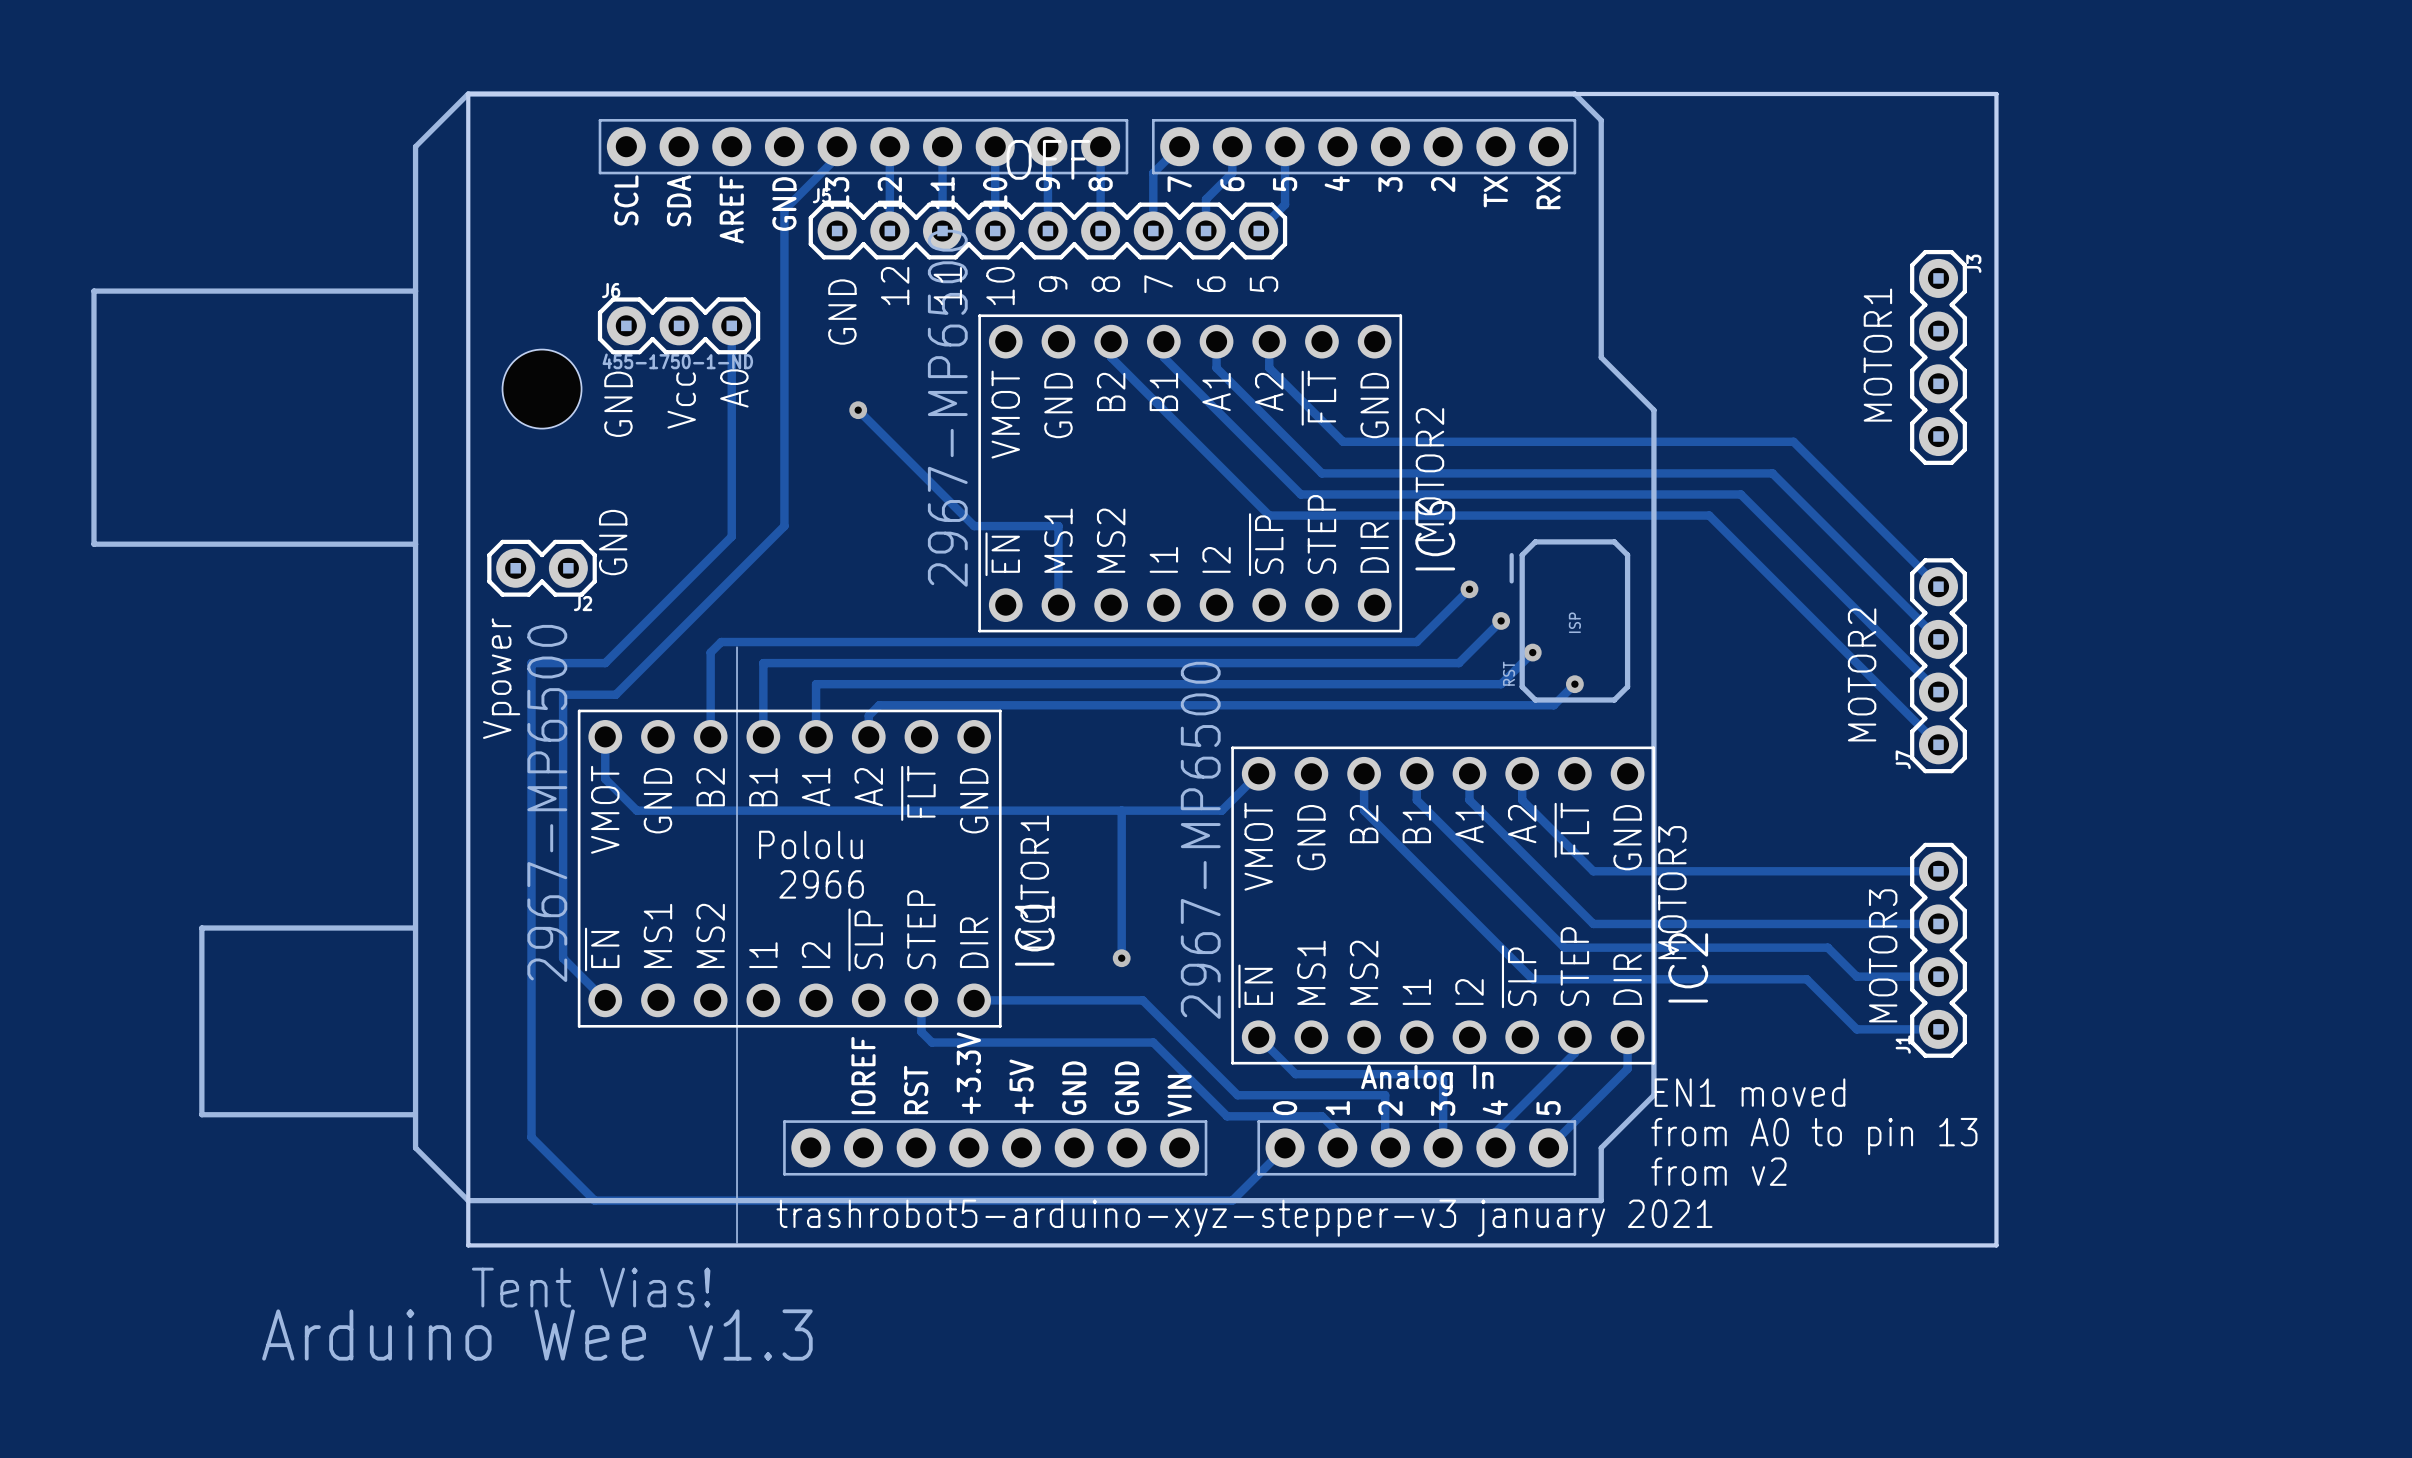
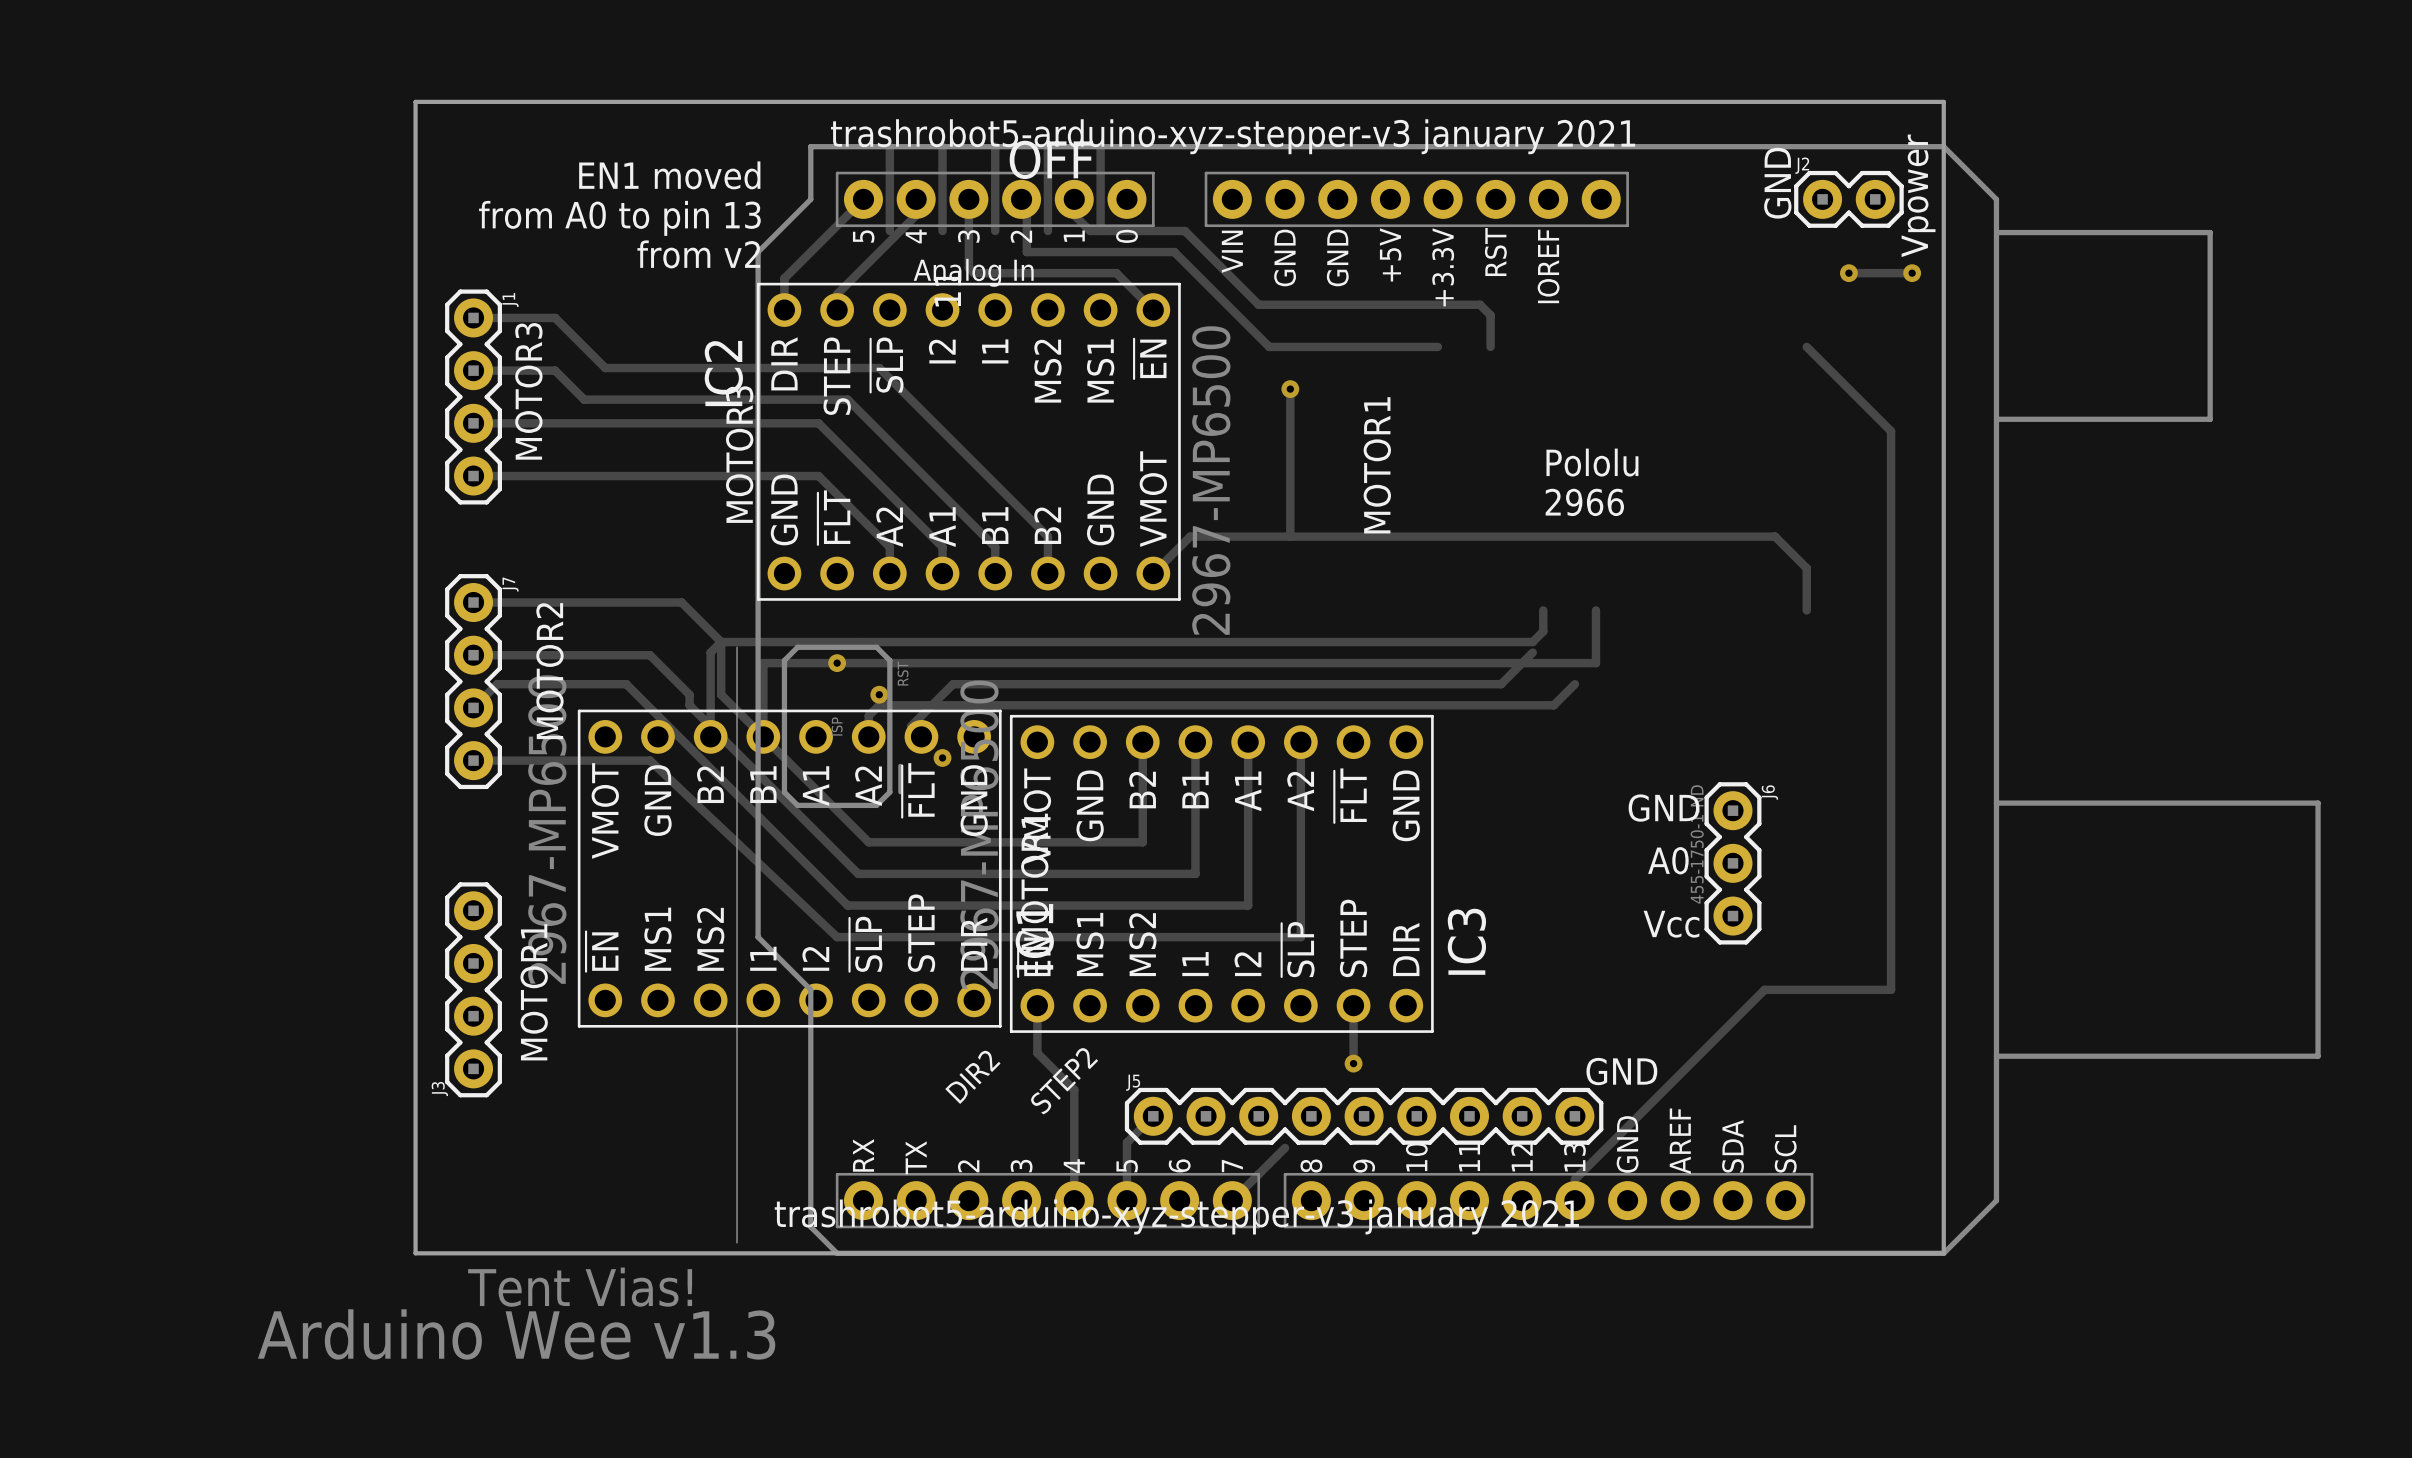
board edge: (468, 93) (1996, 93) (1996, 1245) (468, 1245) (468, 93) -> (415, 101) (1943, 101) (1943, 1253) (415, 1253) (415, 101)
text: none -> trashrobot5-arduino-xyz-stepper-v3 january 2021 (1233, 136)
track: (837, 146) (837, 157) (784, 209) (784, 278) -> (863, 199) (784, 278)
track: (1179, 146) (1153, 173) (1153, 231) -> none
track: (1232, 146) (1232, 173) (1206, 199) (1206, 231) -> none
track: (1285, 146) (1285, 204) (1258, 231) -> none
text: none -> EN1 moved (669, 175)
text: none -> GND (1777, 183)
text: none -> Vpower (1918, 195)
track: none -> (916, 199) (916, 215) (837, 294) (837, 310)
track: none -> (968, 199) (968, 267) (974, 273) (1116, 273) (1153, 310)
track: none -> (1021, 199) (1026, 204) (1026, 252) (1174, 252) (1269, 346) (1437, 346)
track: none -> (1074, 199) (1074, 215) (1090, 231) (1184, 231) (1258, 304) (1480, 304) (1490, 315) (1490, 346)
text: none -> from A0 to pin 13 (619, 218)
J5 position: (1047, 231) -> (1364, 1116)
text: none -> from v2 (698, 254)
J3 name position: J3 (1973, 263) -> J3 (439, 1088)
track: none -> (1848, 273) (1912, 273)
via: none -> (1848, 273)
via: none -> (1912, 273)
text: 9 (1053, 284) -> none
text: 8 (1105, 284) -> none
text: 7 (1158, 284) -> none
text: 6 (1211, 284) -> none
text: 5 (1263, 284) -> none
text: 12 (895, 286) -> none
text: 10 (1000, 286) -> none
track: (784, 310) (784, 526) (615, 694) (563, 694) (563, 958) (605, 1000) -> none
text: GND (842, 312) -> none
track: none -> (473, 317) (555, 317) (605, 368) (879, 368) (1047, 536) (1047, 573)
J6 rotation: 0° (679, 325) -> 90° clockwise (1732, 863)
J6 position: (679, 325) -> (1732, 863)
track: (731, 325) (731, 536) (605, 663) (531, 663) (531, 1137) (594, 1200) (1232, 1200) -> none
track: (1111, 341) (1111, 357) (1269, 515) (1709, 515) (1938, 744) -> none
track: (1163, 341) (1163, 357) (1300, 494) (1740, 494) (1938, 692) -> none
track: (1216, 341) (1216, 368) (1321, 473) (1772, 473) (1938, 639) -> none
track: (1269, 341) (1269, 368) (1343, 441) (1793, 441) (1938, 586) -> none
track: none -> (1806, 346) (1891, 431) (1891, 989) (1764, 989) (1574, 1179) (1574, 1200)
text: MOTOR1 (1877, 355) -> none
J3 position: (1938, 357) -> (473, 989)
track: none -> (473, 370) (555, 370) (584, 399) (847, 399) (858, 410)
text: A0 (734, 388) -> none
hole: (542, 389) -> none
via: none -> (1290, 389)
text: none -> MOTOR3 (528, 391)
text: Vcc (681, 400) -> none
text: GND (618, 404) -> none
via: (858, 410) -> none
track: none -> (473, 423) (818, 423) (942, 547) (942, 573)
text: none -> MOTOR3 (739, 454)
text: none -> Pololu (1592, 462)
IC3 position: (1190, 473) -> (1221, 873)
text: MOTOR2 (1429, 474) -> MOTOR1 (1377, 465)
track: none -> (473, 476) (818, 476) (889, 547) (889, 573)
text: none -> 2966 (1584, 502)
track: (974, 526) (1058, 526) (1058, 605) -> (974, 526) (995, 547) (995, 573)
text: GND (613, 542) -> none
J2 position: (542, 568) -> (1848, 199)
track: none -> (1153, 573) (1190, 536) (1775, 536) (1806, 568) (1806, 610)
track: (1469, 589) (1416, 642) -> (1543, 610) (1543, 631) (1532, 642) (1416, 642)
via: (1469, 589) -> none
track: none -> (473, 602) (681, 602) (721, 642) (721, 694) (868, 842) (1142, 842) (1142, 742)
J2 name position: J2 (583, 603) -> J2 (1802, 165)
track: (1501, 620) (1458, 663) -> (1595, 610) (1595, 663) (1458, 663)
via: (1501, 620) -> none
part: (873, 647) -> none
via: (1532, 652) -> none
track: none -> (473, 655) (650, 655) (689, 694) (689, 705) (858, 873) (1195, 873) (1195, 742)
via: none -> (837, 663)
J7 position: (1938, 665) -> (473, 681)
text: none -> MOTOR2 (549, 671)
text: MOTOR2 (1862, 674) -> none
text: Vpower (501, 678) -> none
track: (953, 684) (816, 684) (816, 736) -> (953, 684) (910, 726)
via: (1574, 684) -> none
via: none -> (879, 694)
part: none -> (1538, 700)
track: none -> (473, 707) (497, 684) (626, 684) (847, 905) (1248, 905) (1248, 742)
track: (605, 736) (605, 779) (636, 810) (1221, 810) (1258, 773) -> none
track: none -> (1300, 742) (1300, 937) (837, 937) (650, 760) (473, 760)
IC2 footprint: [1231, 746, 1656, 1065] -> [756, 282, 1181, 601]
via: none -> (942, 757)
J7 name position: J7 (1903, 759) -> J7 (510, 584)
track: (1364, 773) (1364, 810) (1532, 979) (1806, 979) (1856, 1029) (1938, 1029) -> none
track: (1416, 773) (1416, 800) (1564, 947) (1827, 947) (1856, 976) (1938, 976) -> none
track: (1469, 773) (1469, 800) (1593, 923) (1938, 923) -> none
track: (1522, 773) (1522, 800) (1593, 871) (1938, 871) -> none
text: none -> GND (1664, 808)
track: (1121, 810) (1121, 958) -> (1290, 389) (1290, 536)
IC2 value position: 2967-MP6500 (1200, 840) -> 2967-MP6500 (1211, 480)
text: Pololu (810, 844) -> none
text: none -> A0 (1668, 860)
text: 2966 (821, 884) -> none
text: MOTOR3 (1672, 892) -> none
text: none -> Vcc (1671, 924)
J1 position: (1938, 950) -> (473, 396)
text: MOTOR3 (1883, 955) -> none
via: (1121, 958) -> none
IC2 name position: IC2 (1688, 967) -> IC2 (723, 373)
text: none -> MOTOR1 (534, 992)
track: (921, 1000) (921, 1031) (931, 1042) (1153, 1042) (1227, 1116) (1321, 1116) (1337, 1132) (1337, 1147) -> none
track: (974, 1000) (1142, 1000) (1237, 1095) (1385, 1095) (1385, 1142) (1390, 1147) -> none
track: none -> (1037, 1005) (1037, 1053) (1074, 1089) (1074, 1200)
track: none -> (1353, 1005) (1353, 1063)
track: (1258, 1037) (1295, 1074) (1437, 1074) (1443, 1079) (1443, 1147) -> none
track: (1574, 1037) (1574, 1053) (1495, 1132) (1495, 1147) -> none
track: (1627, 1037) (1627, 1068) (1548, 1147) -> none
J1 name position: J1 (1903, 1044) -> J1 (510, 299)
via: none -> (1353, 1063)
text: none -> GND (1621, 1071)
text: none -> DIR2 (972, 1077)
text: none -> STEP2 (1064, 1081)
text: EN1 moved (1749, 1092) -> none
track: none -> (1153, 1116) (1126, 1142) (1126, 1200)
text: from A0 to pin 13 (1814, 1136) -> none
text: from v2 (1718, 1171) -> none

